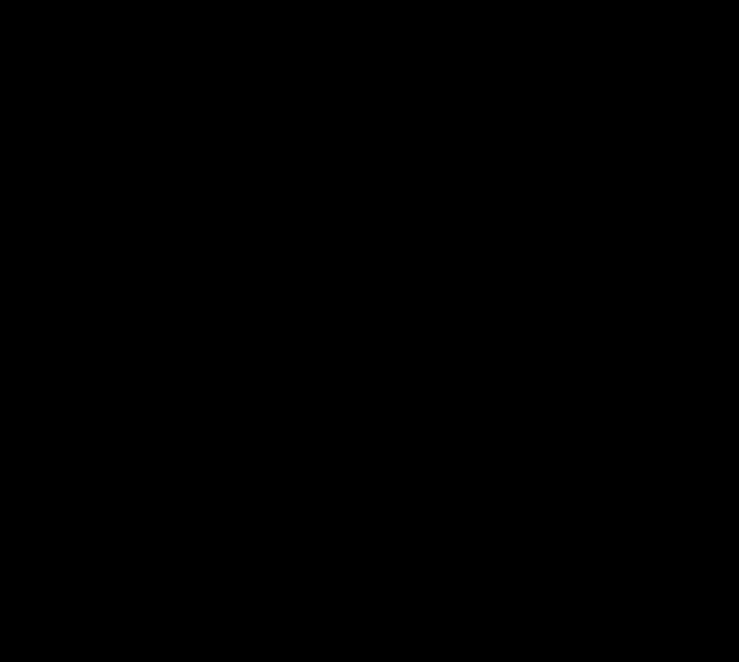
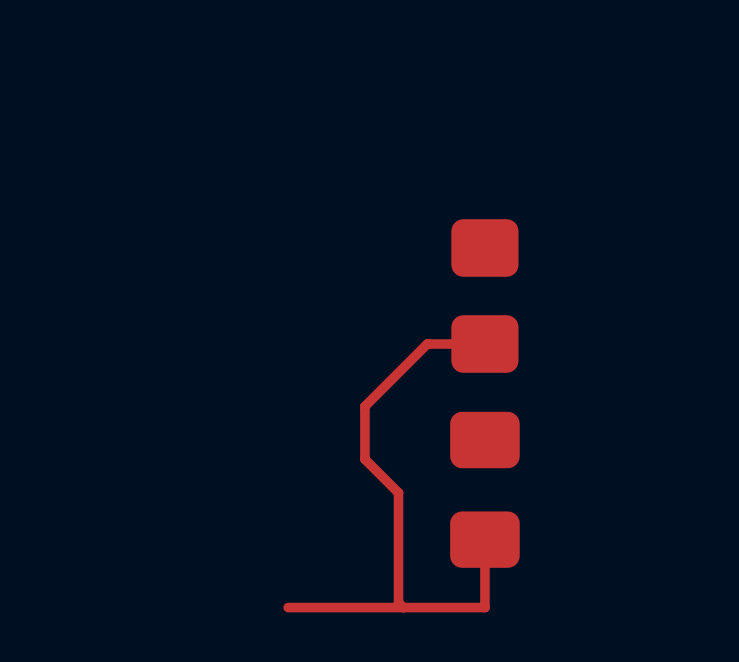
part: none -> (484, 296)
top track: none -> (484, 344) (427, 344) (364, 406) (364, 459) (398, 492) (398, 602) (403, 607)
part: none -> (484, 489)
top track: none -> (484, 539) (484, 607) (288, 607)

